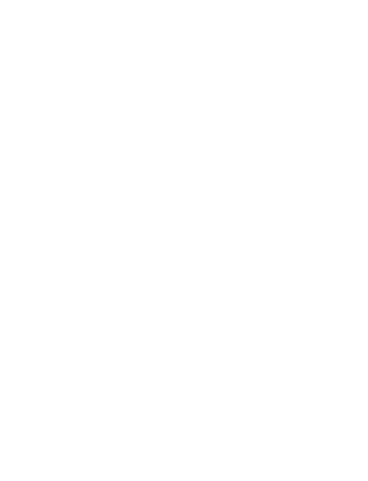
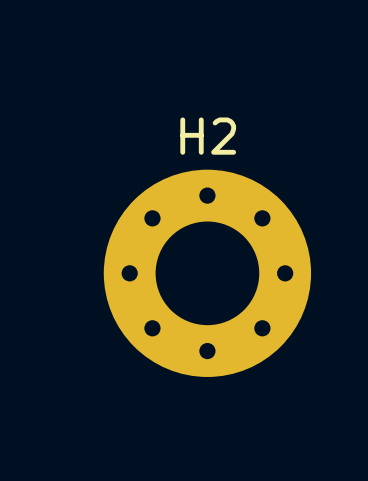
H2: none -> (207, 273)

